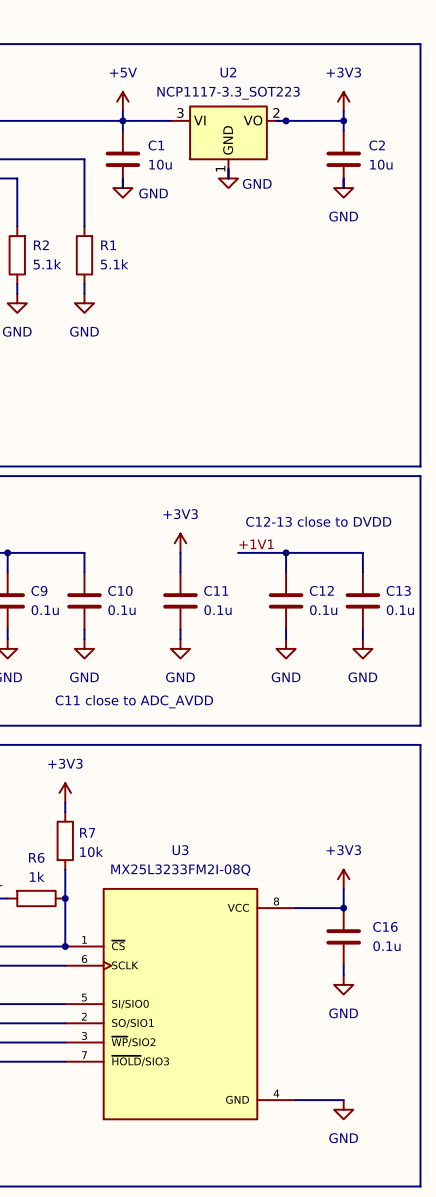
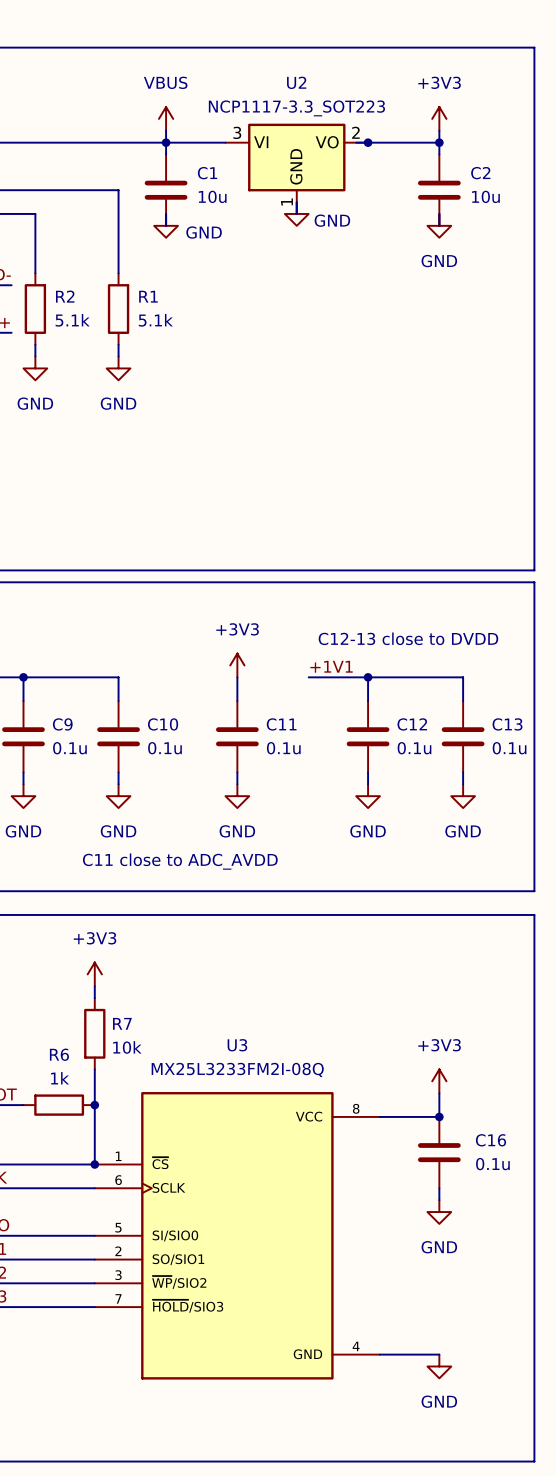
power symbol: +5V (122, 101) -> VBUS (166, 118)

